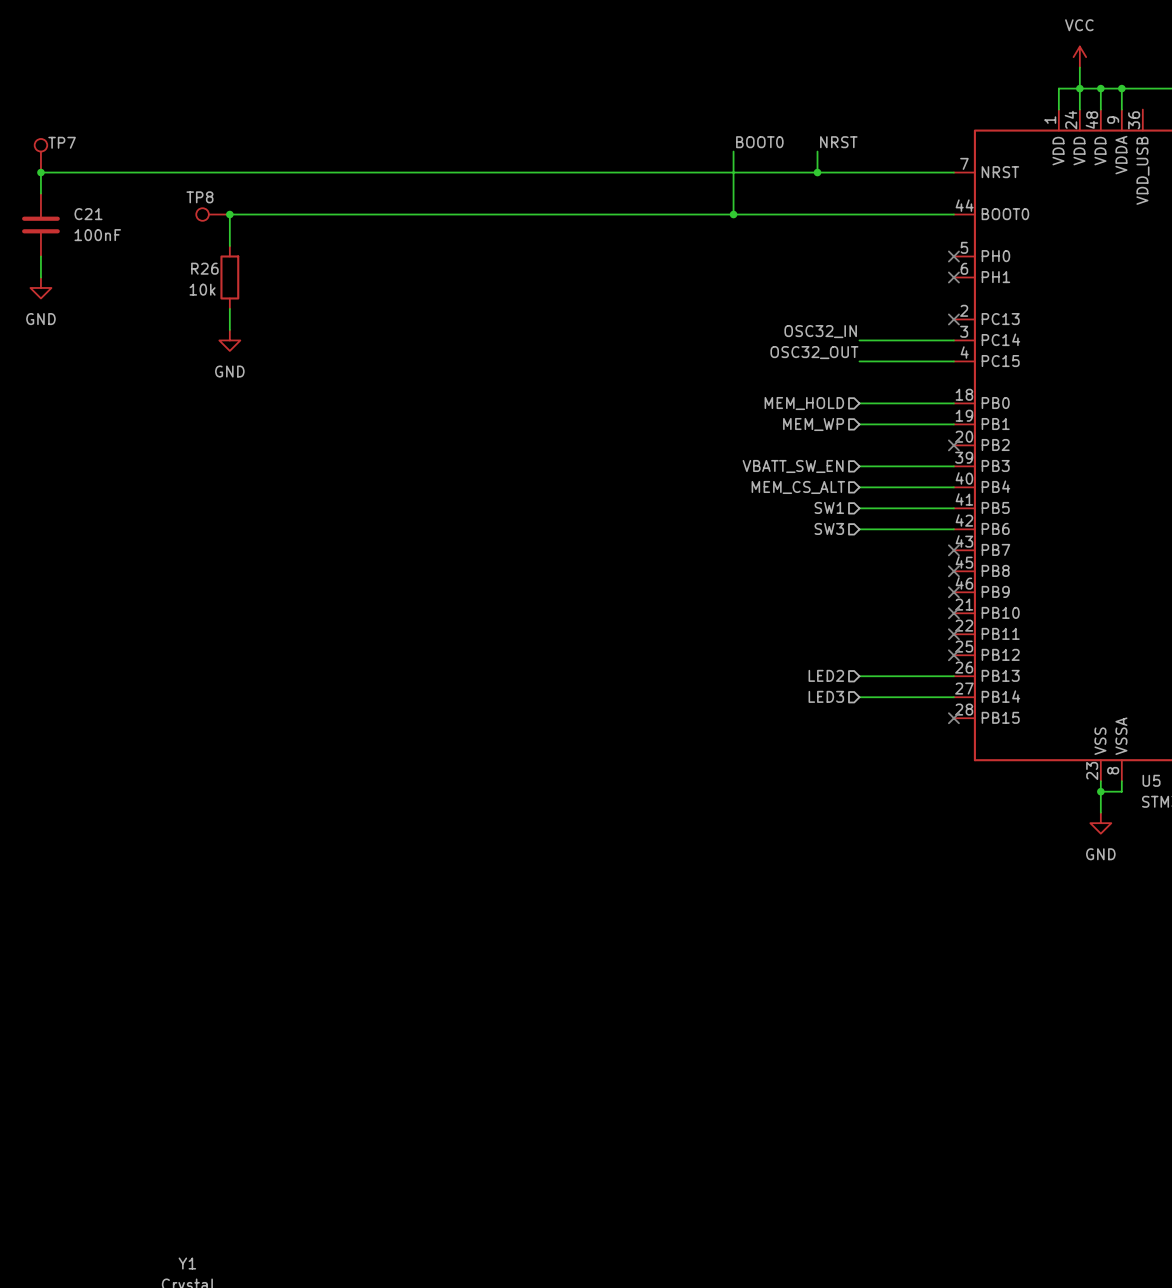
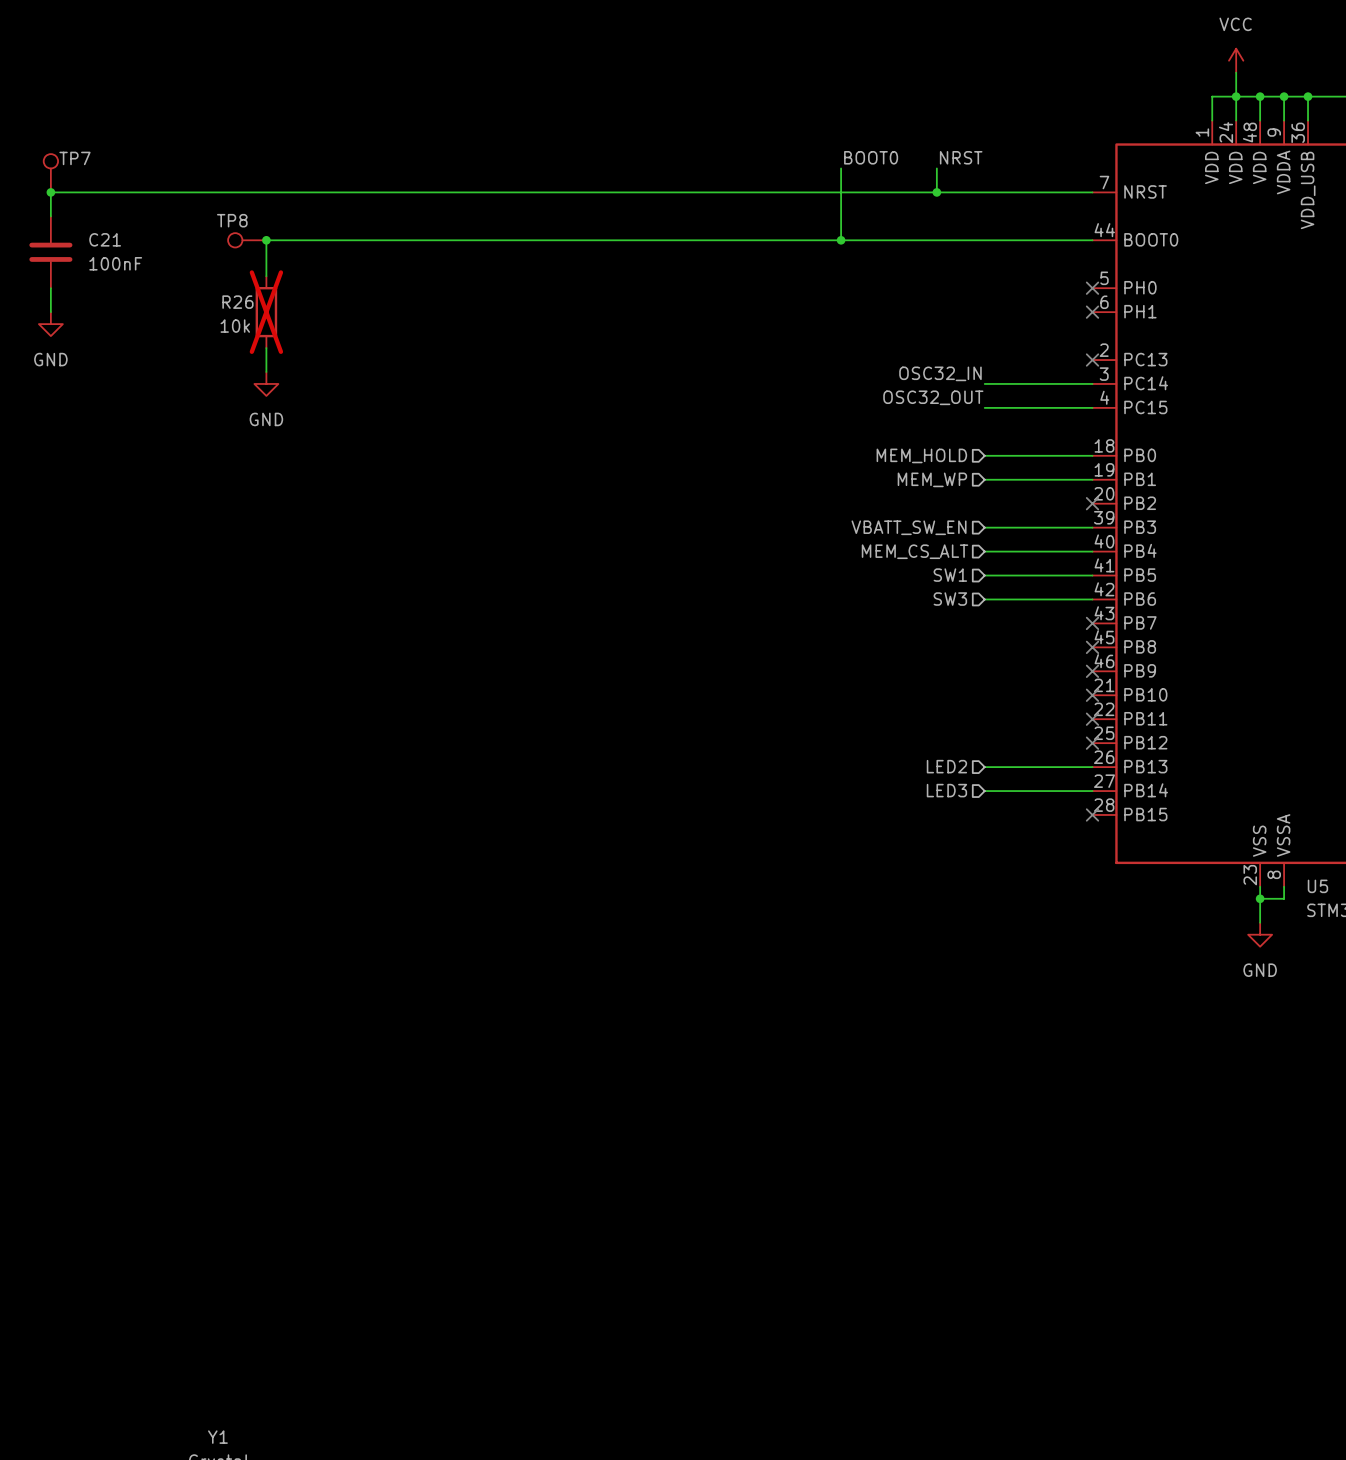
wire: none -> (1308, 96) (1308, 120)
junction: none -> (1308, 96)
R26 do-not-place cross: none -> (266, 312)

